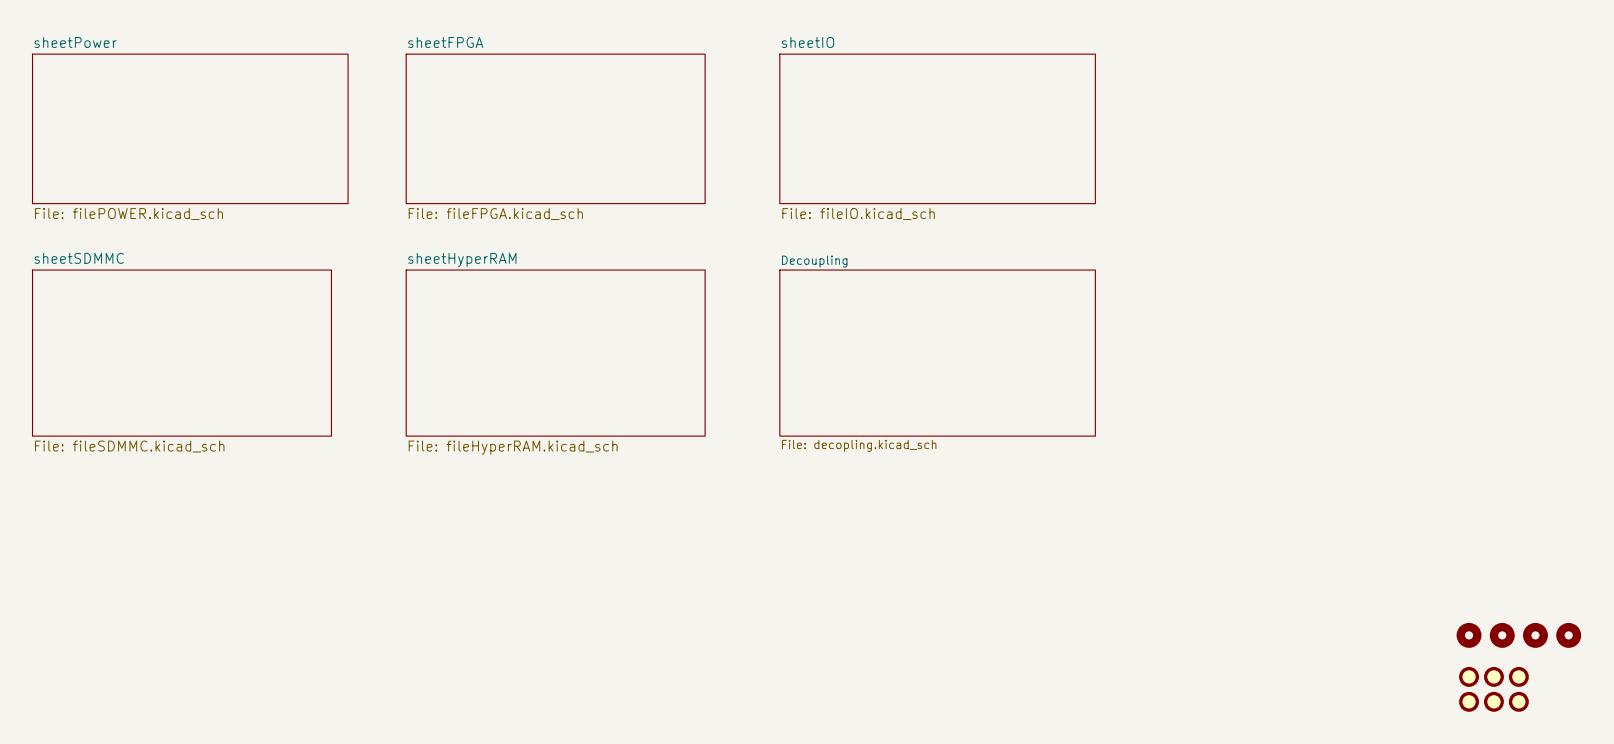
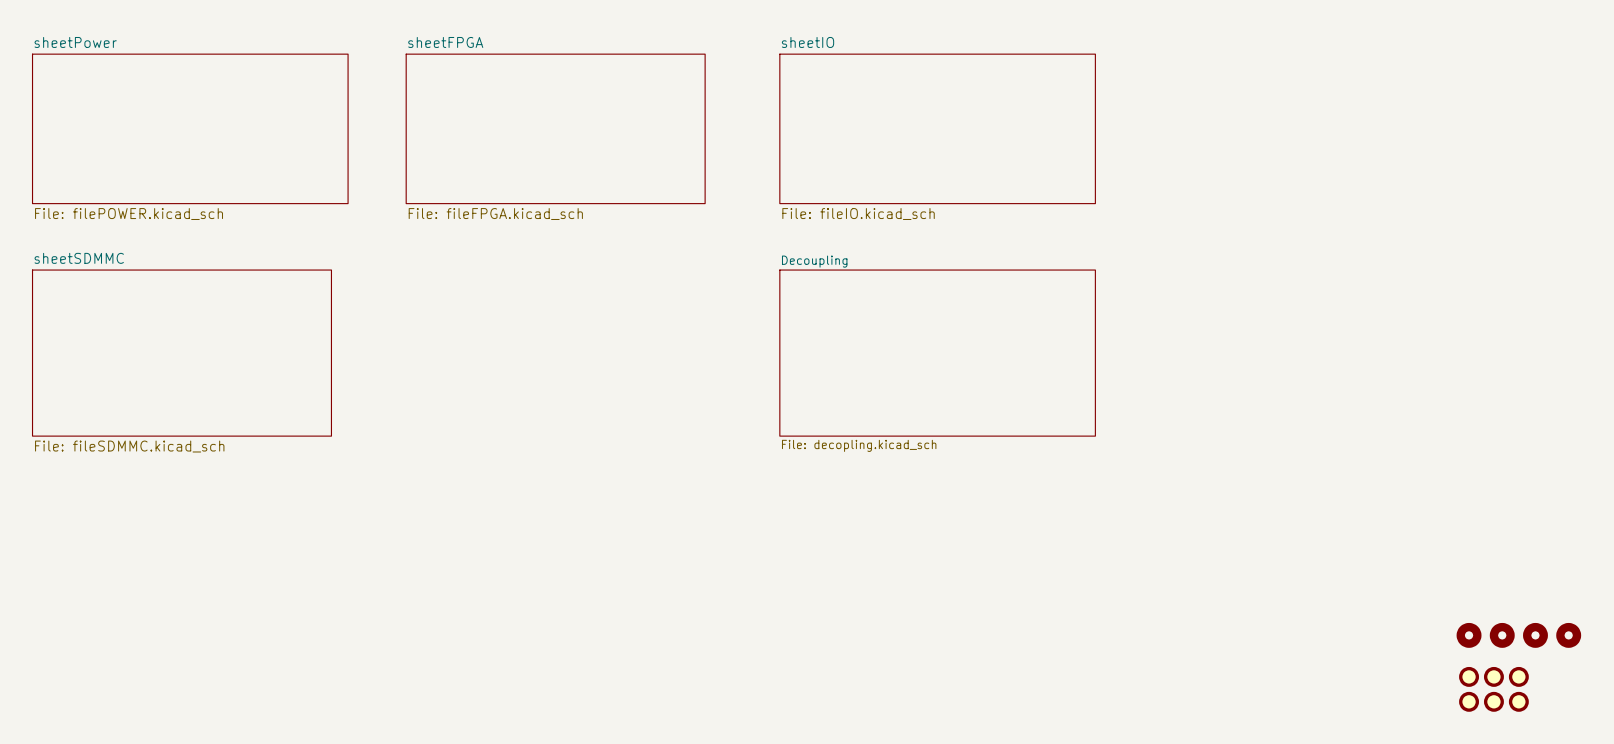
sheet sheetHyperRAM: File: fileHyperRAM.kicad_sch (555, 353) -> none

